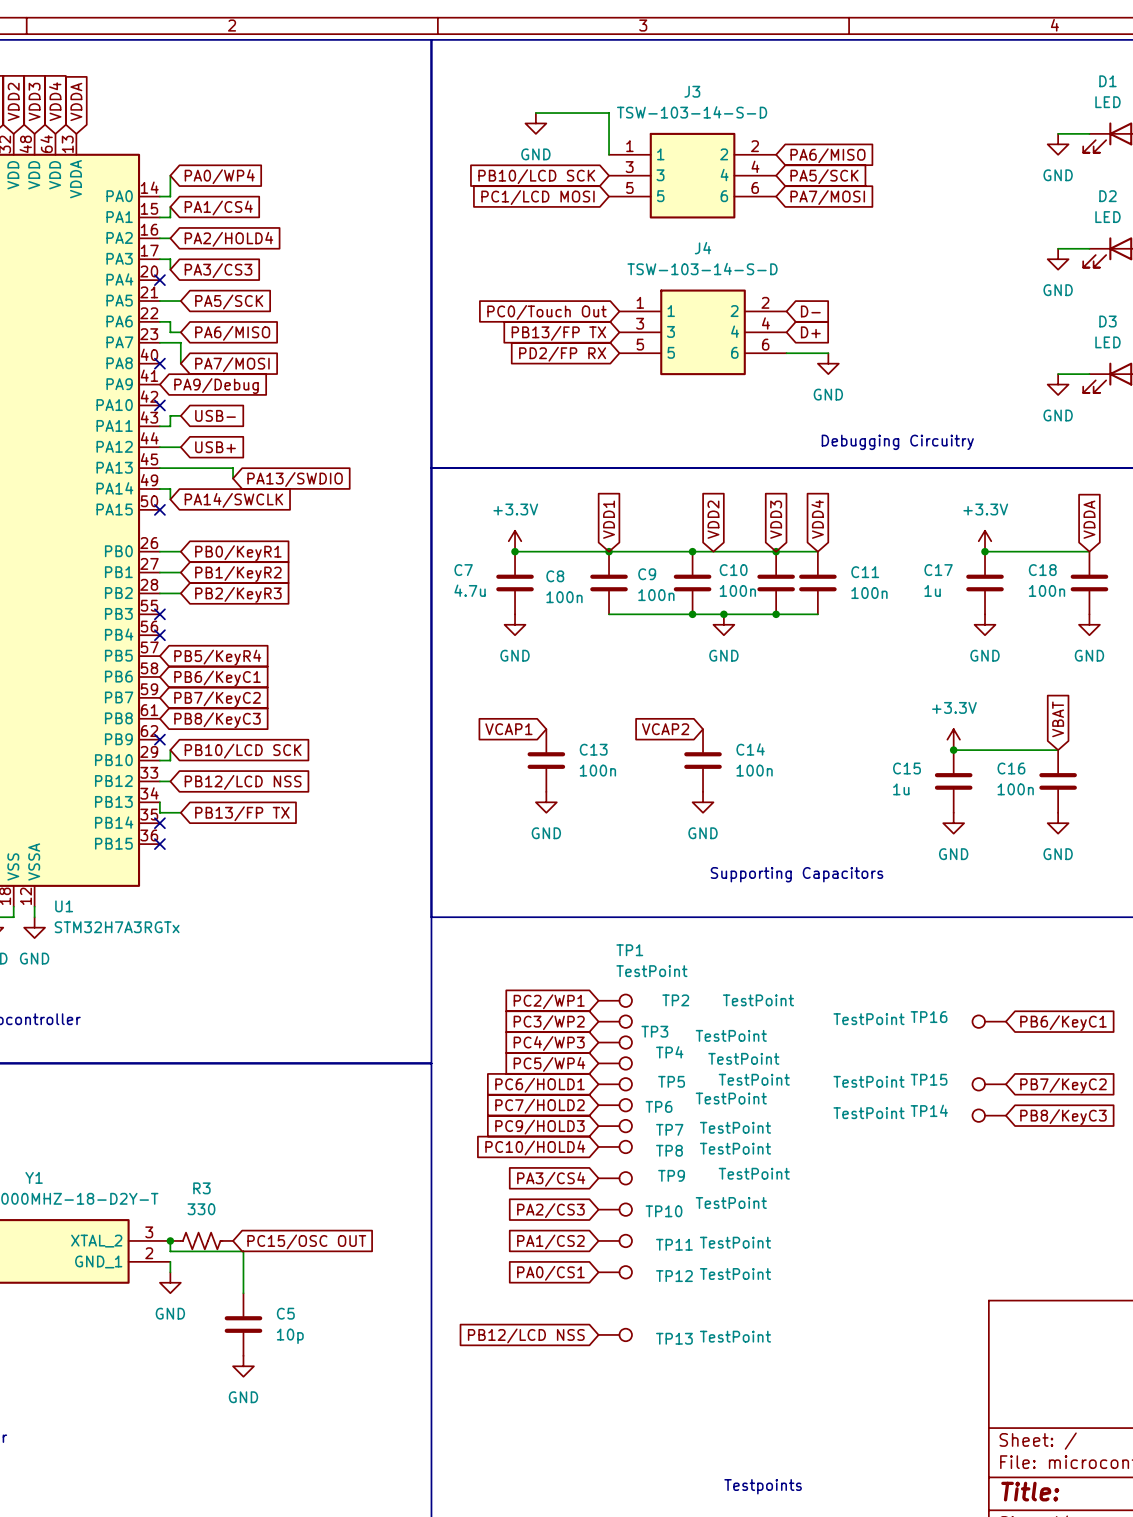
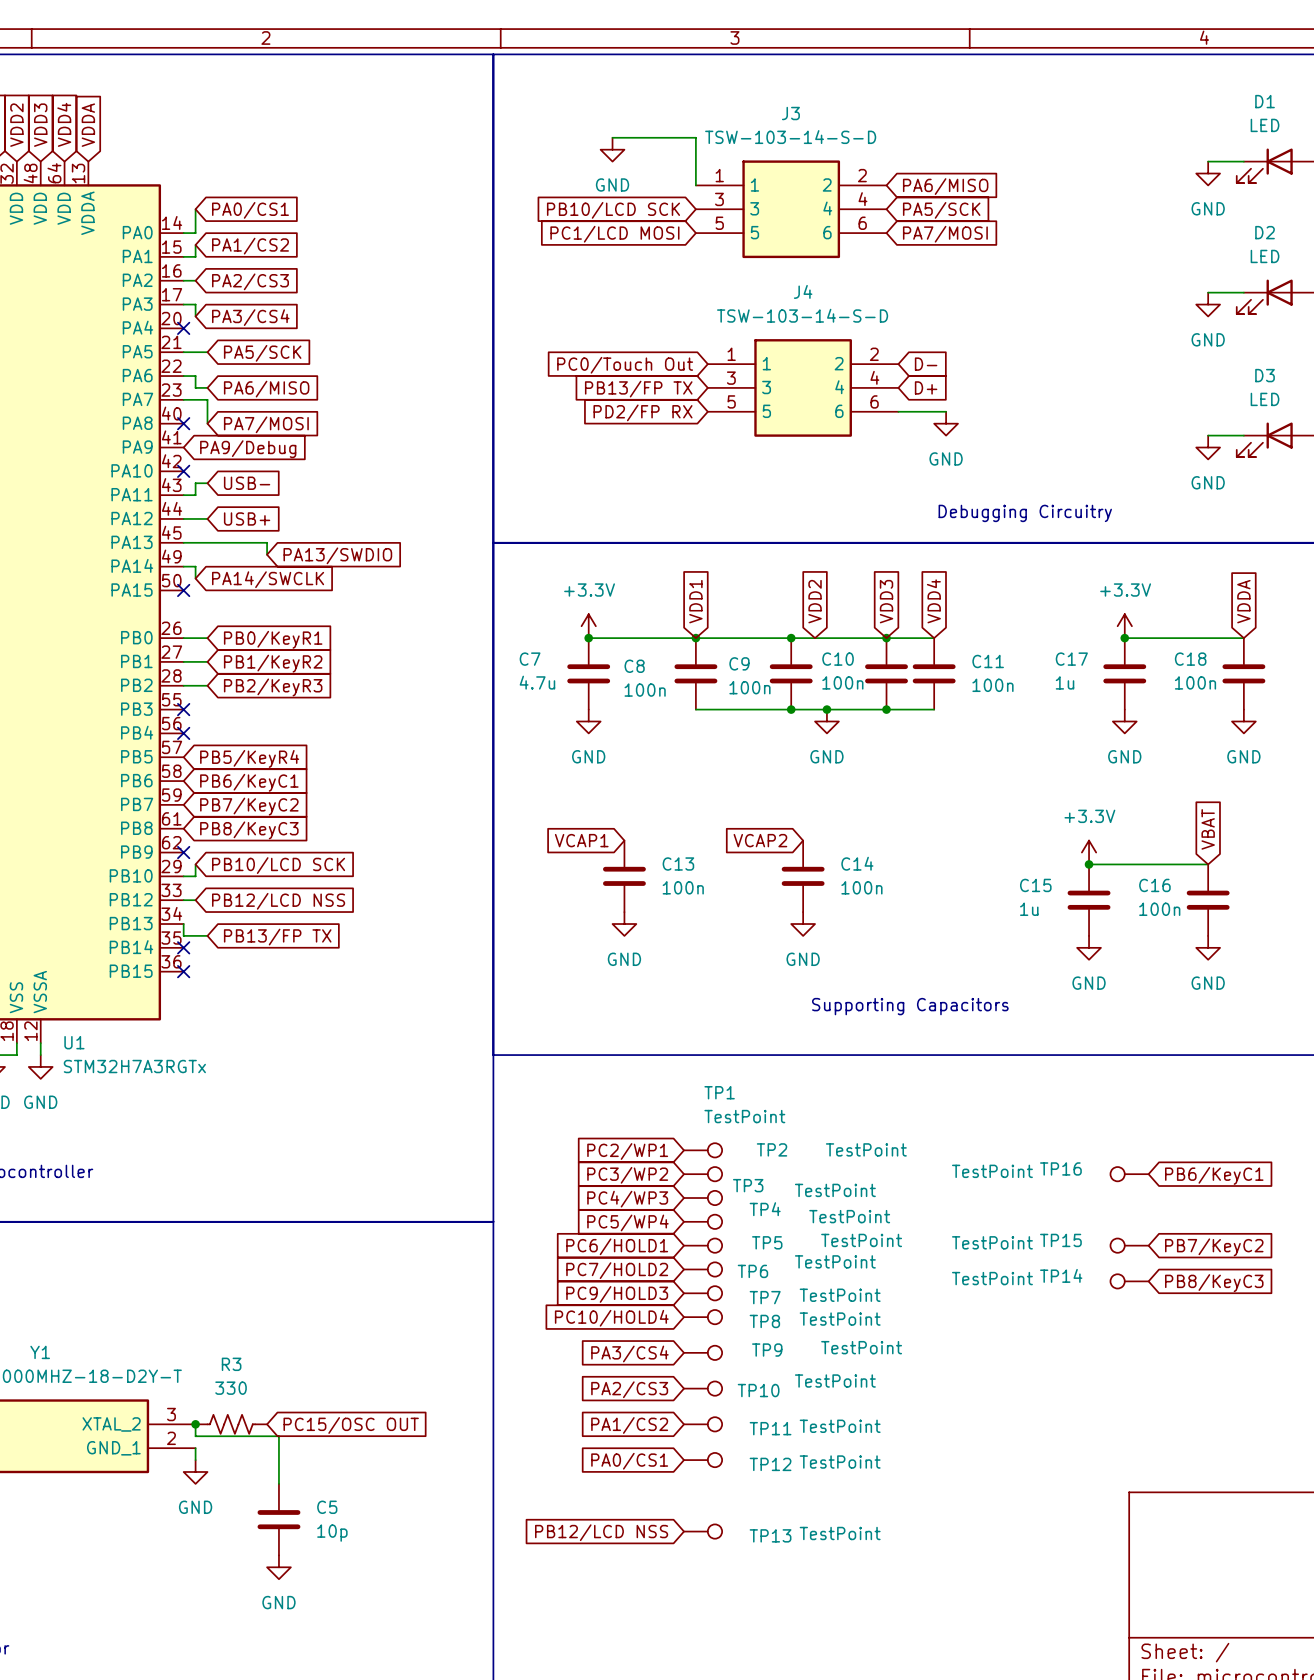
global label: PA0/WP4 (219, 176) -> PA0/CS1 (250, 210)
global label: PA1/CS4 (218, 208) -> PA1/CS2 (250, 246)
global label: PA2/HOLD4 (228, 239) -> PA2/CS3 (250, 281)
global label: PA3/CS3 (218, 270) -> PA3/CS4 (250, 317)

